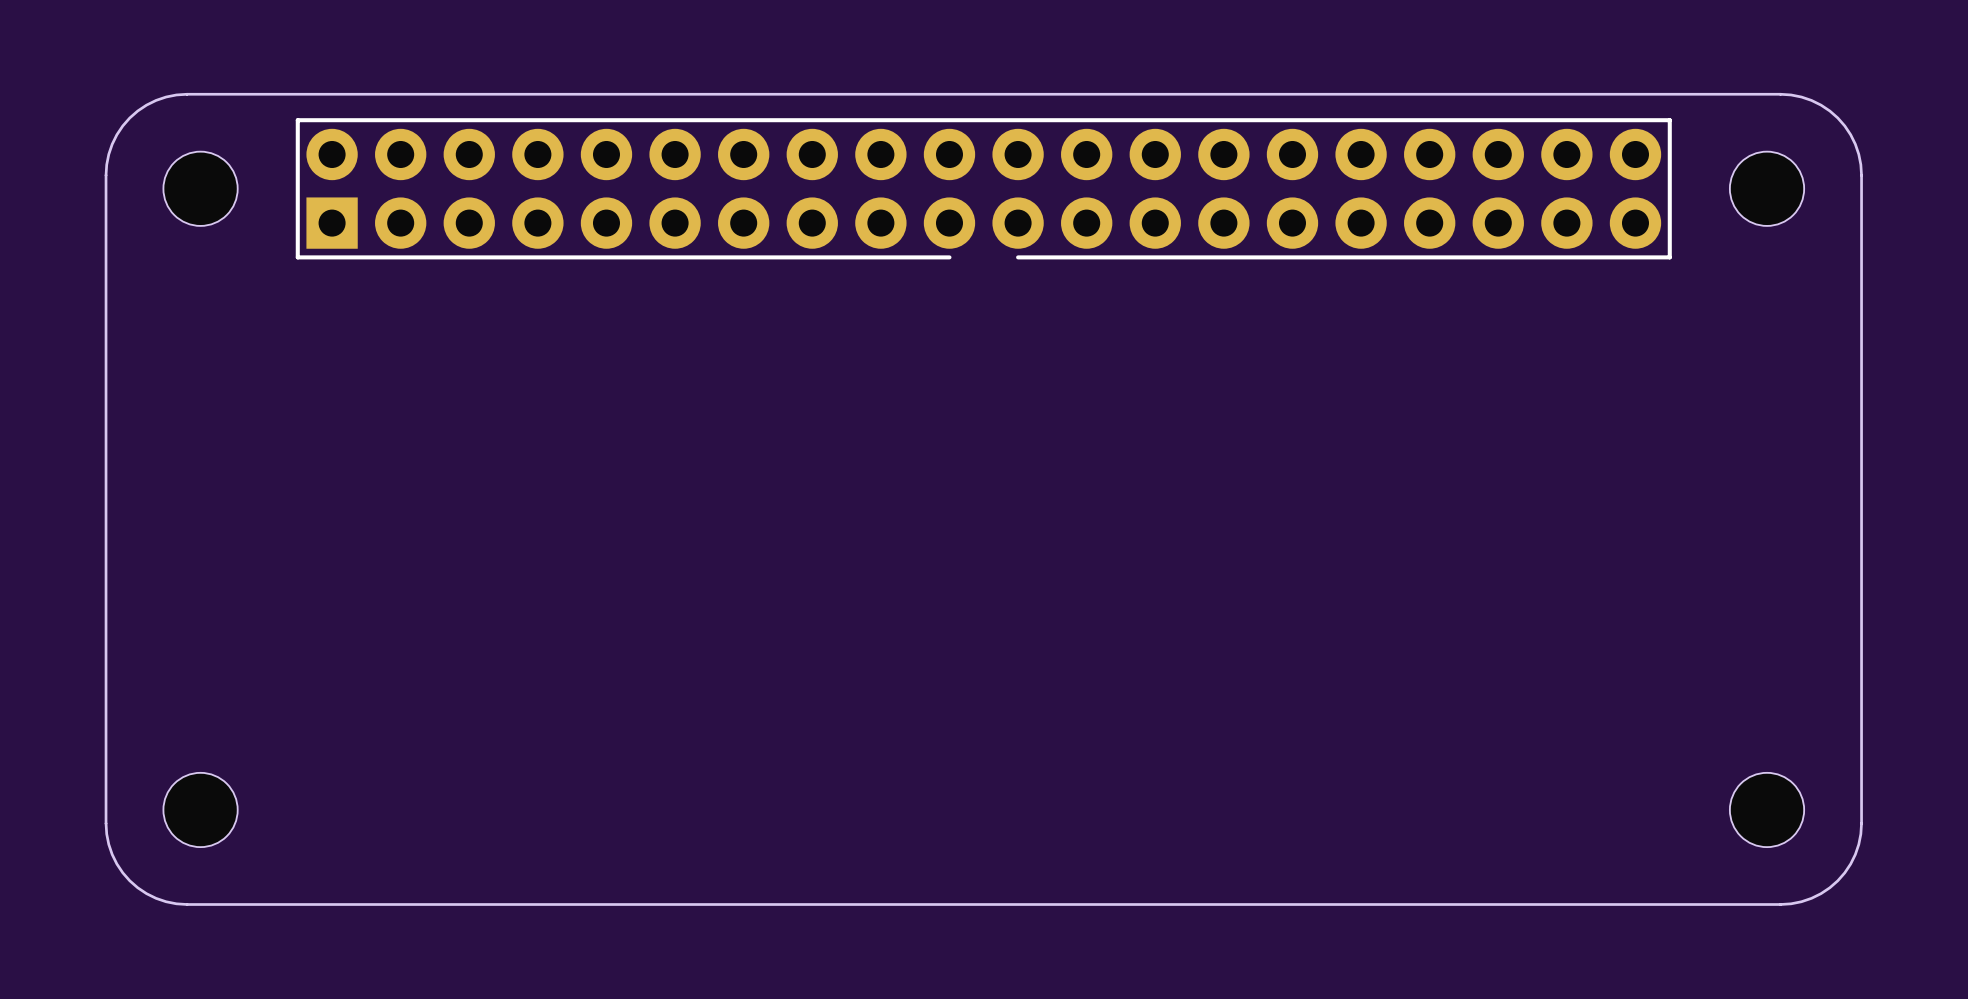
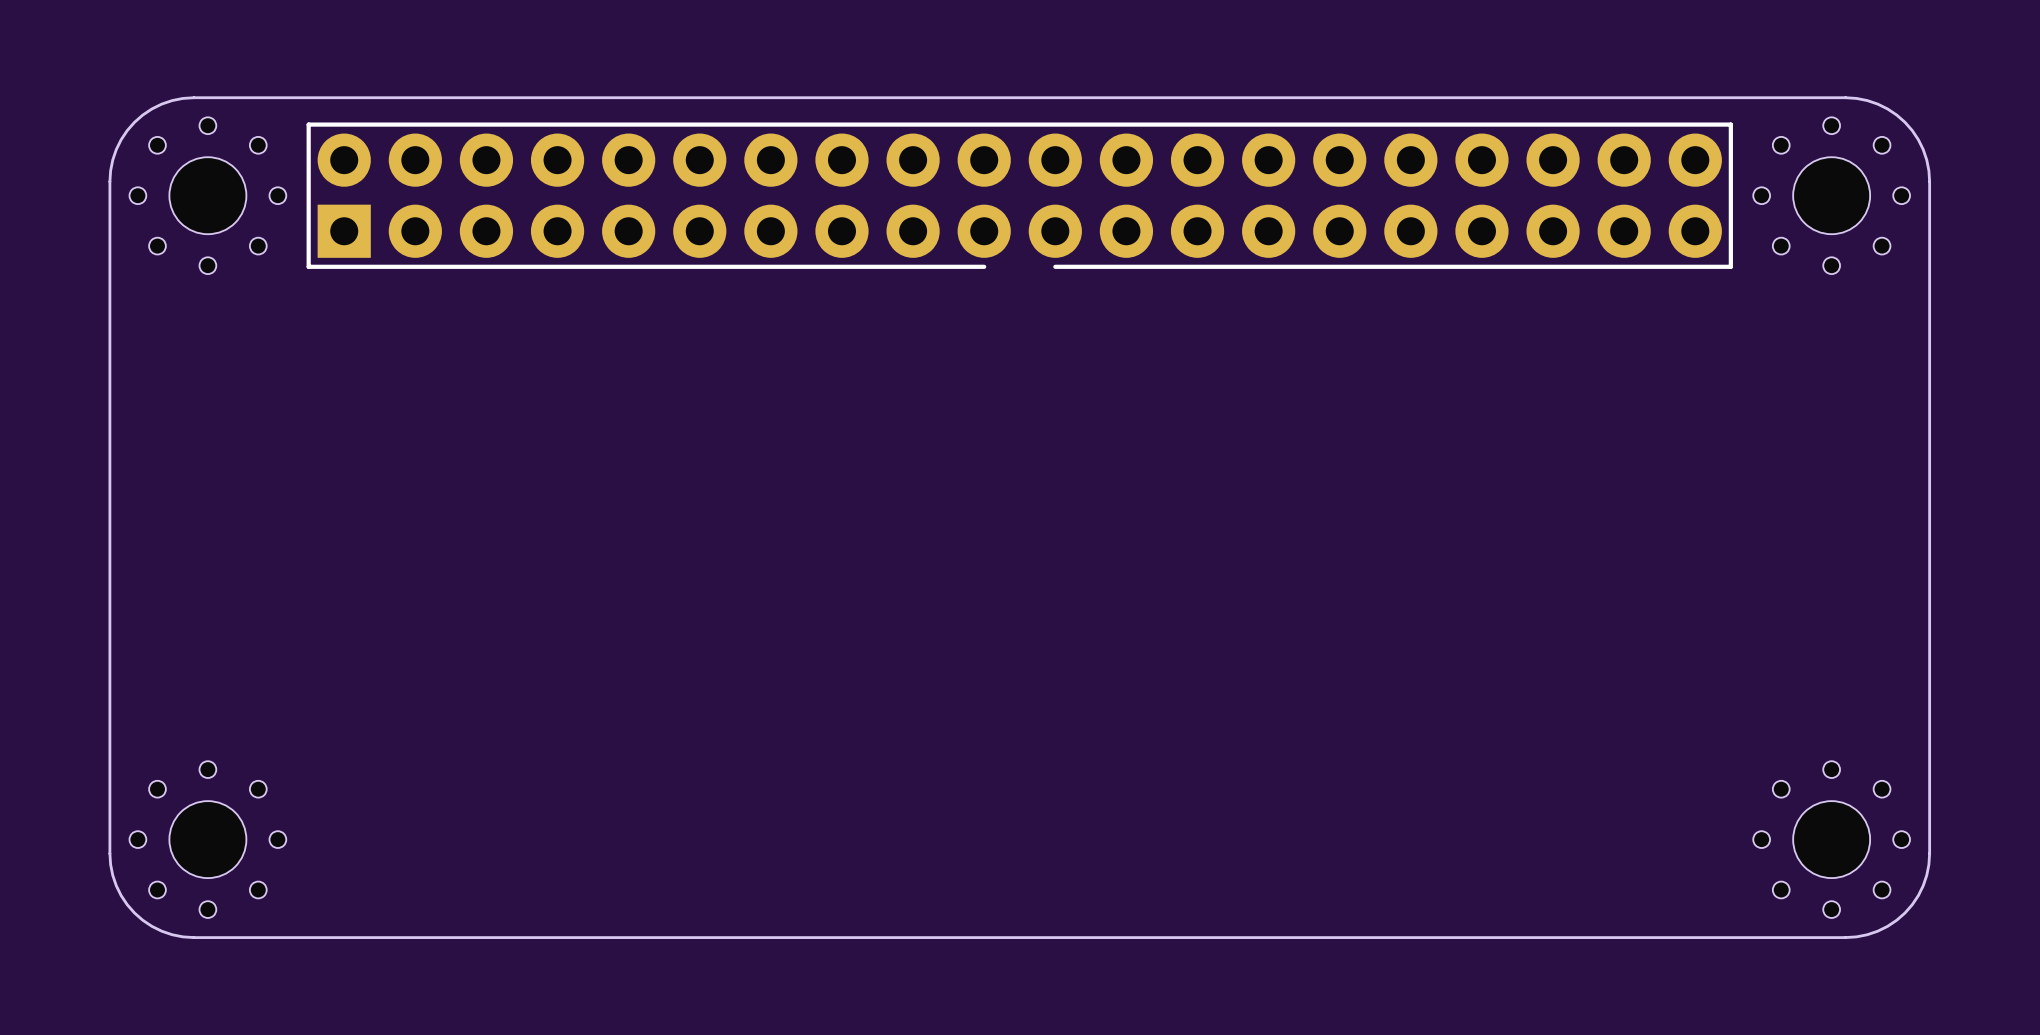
part footprint: [163, 151, 238, 226] -> [129, 117, 287, 275]
part footprint: [1729, 151, 1805, 226] -> [1753, 117, 1911, 275]
part footprint: [163, 772, 238, 848] -> [129, 761, 287, 918]
part footprint: [1729, 772, 1805, 848] -> [1753, 761, 1911, 918]

